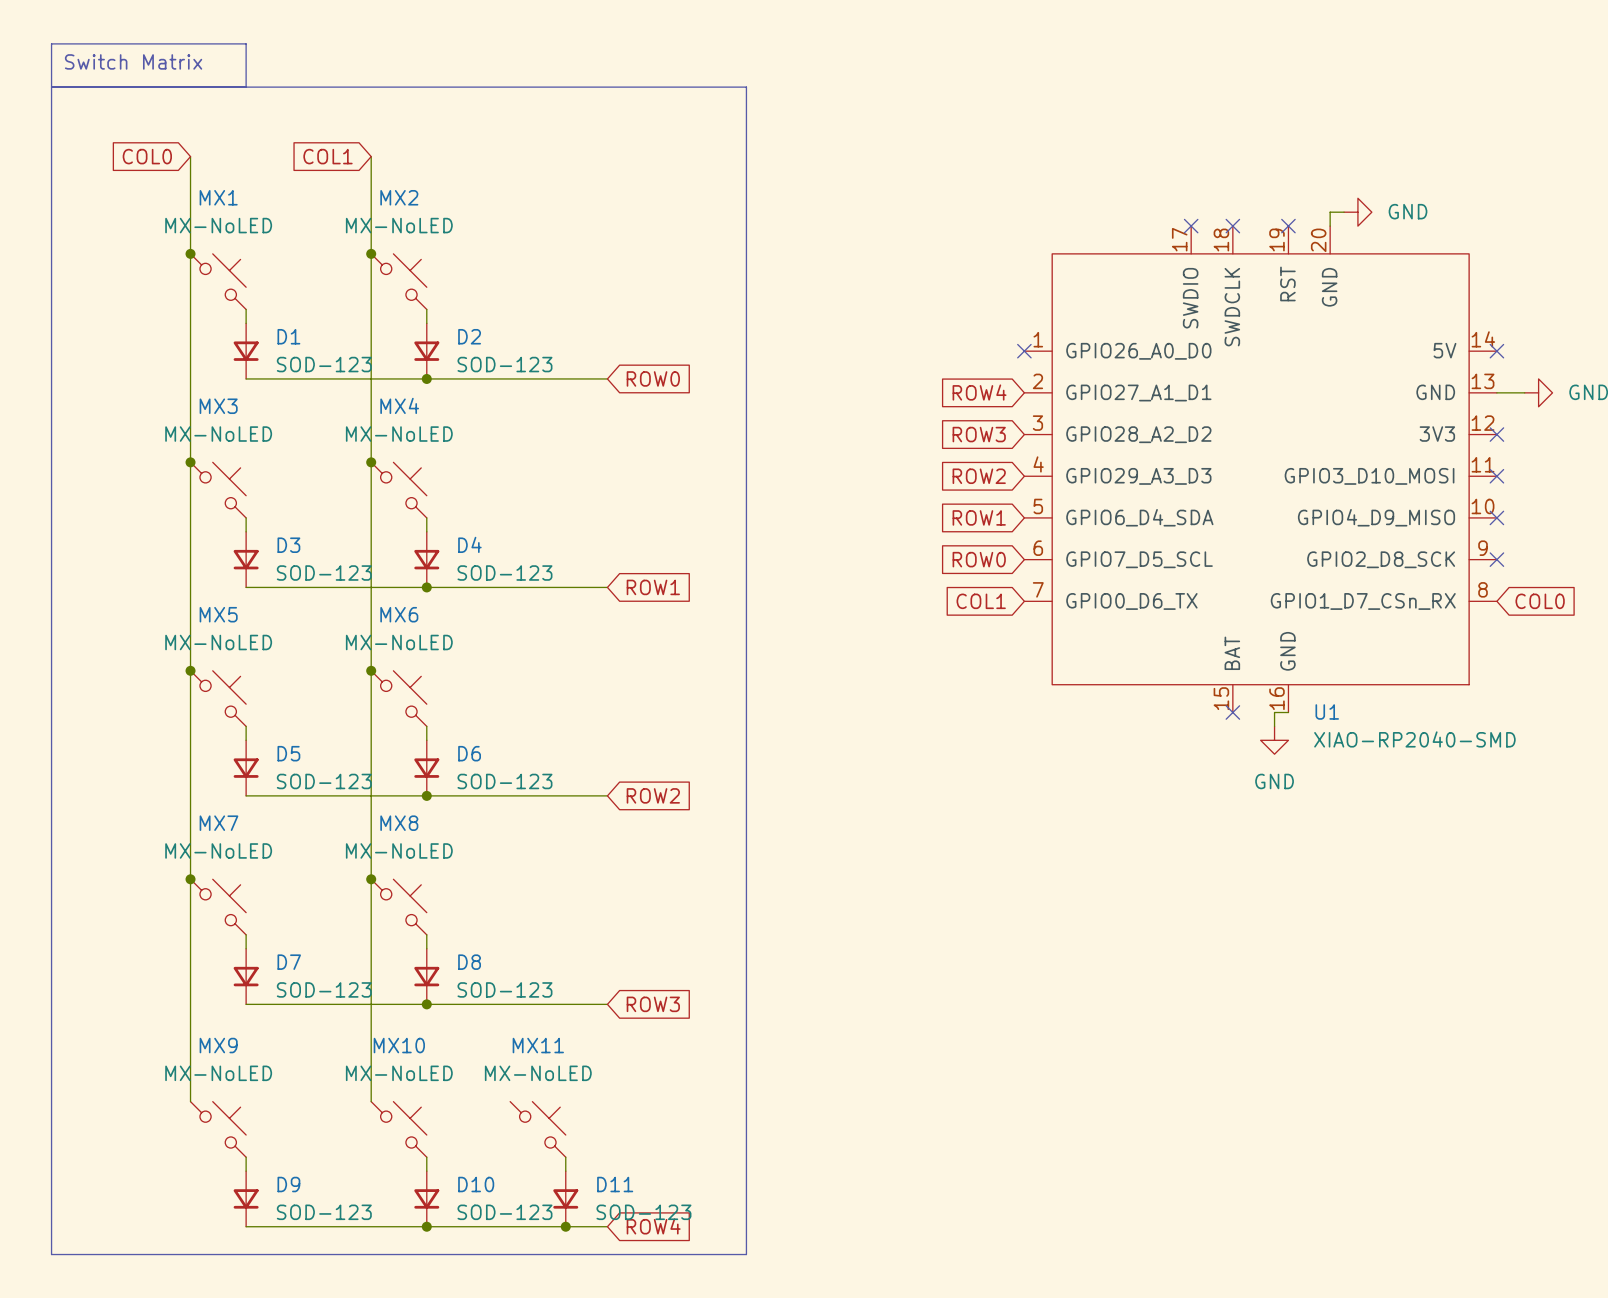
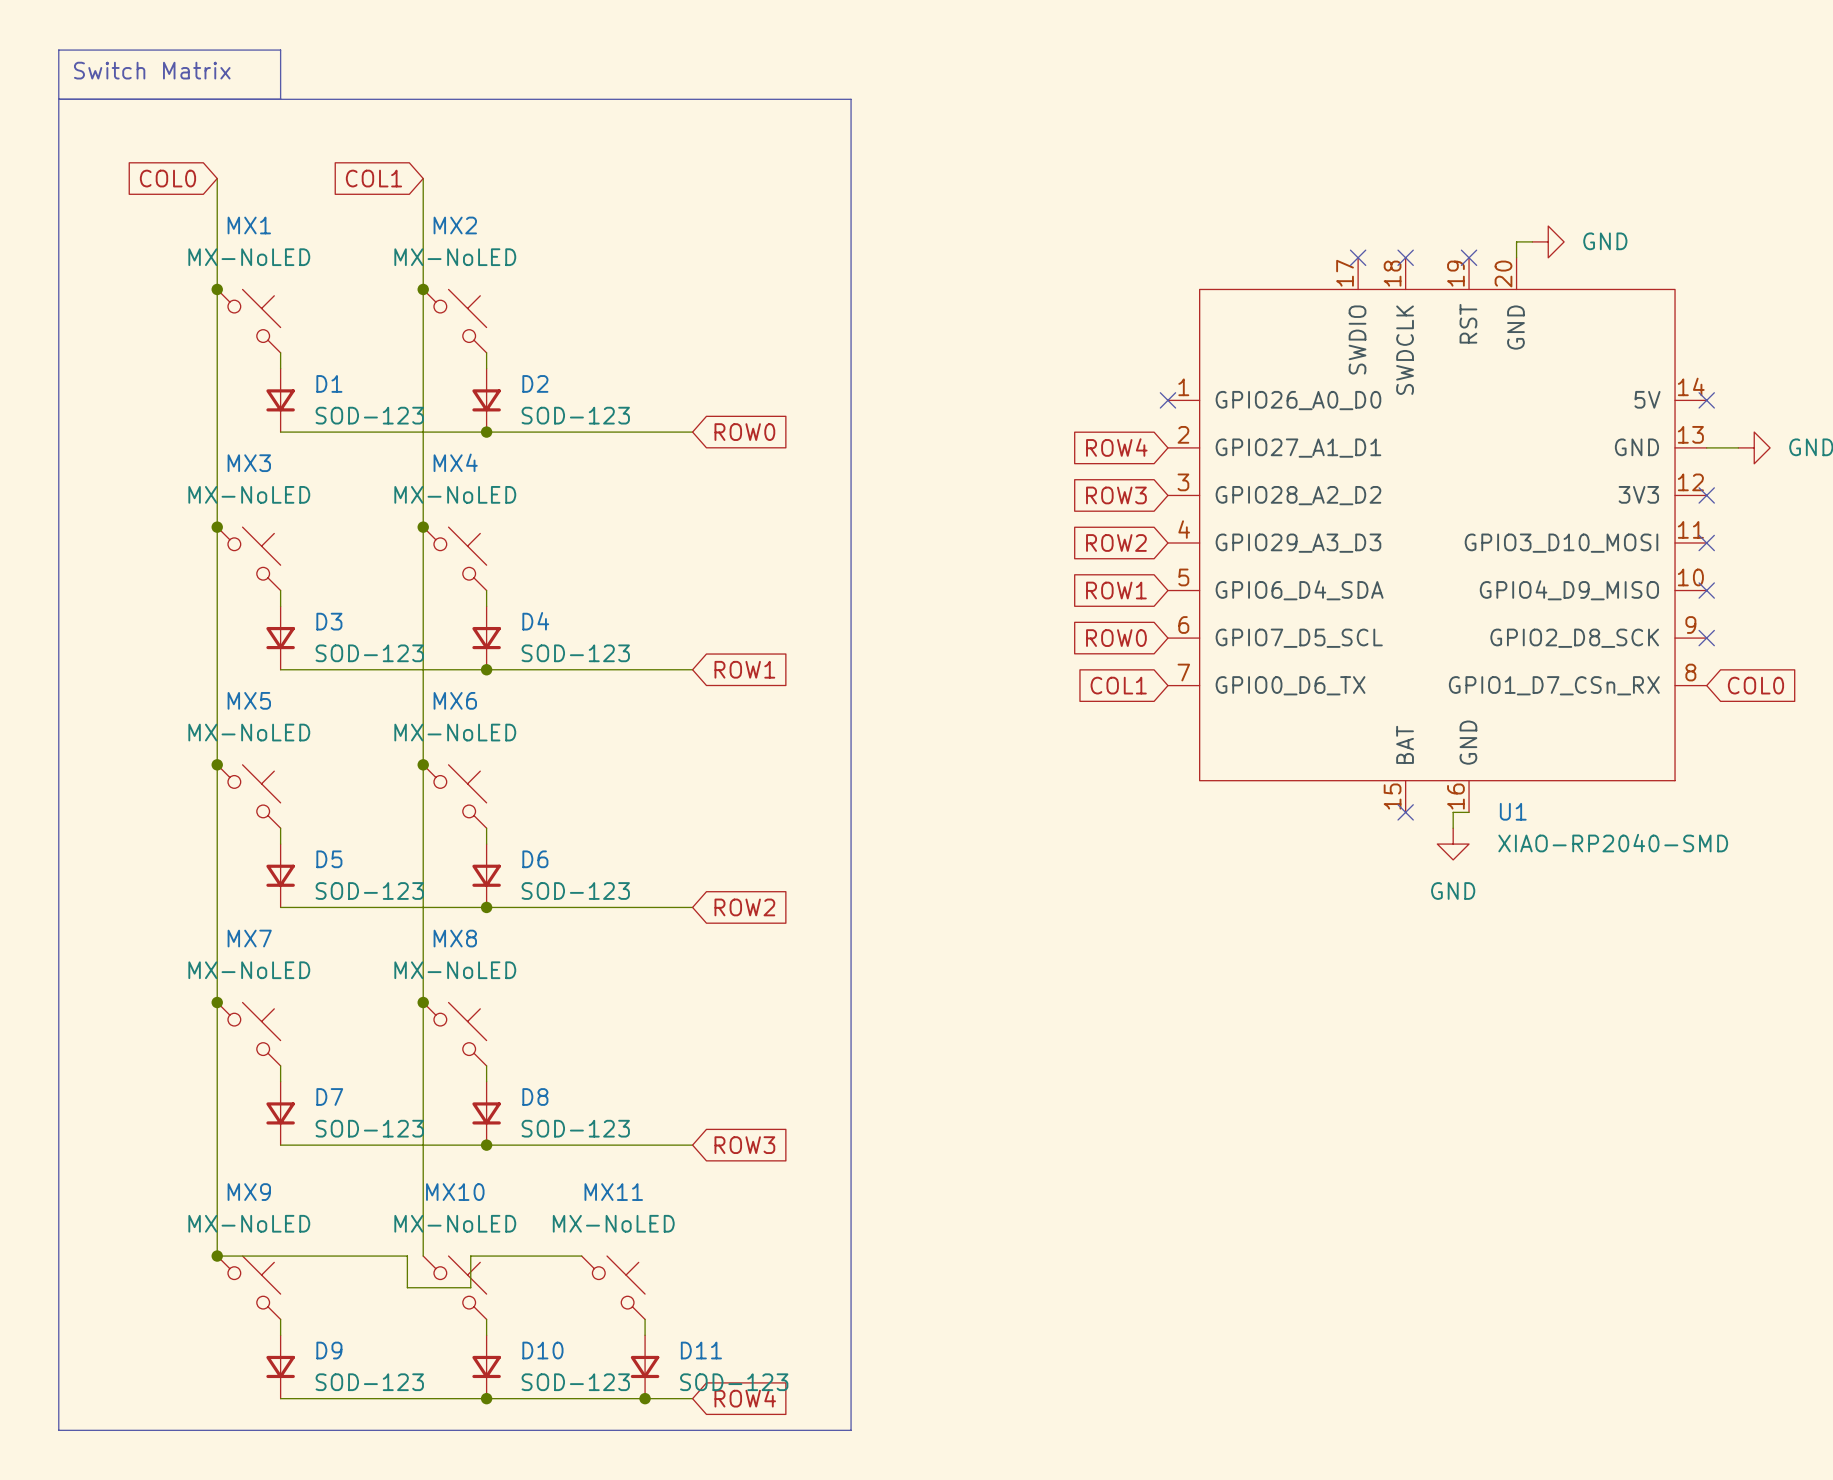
wire: none -> (217, 1256) (407, 1256) (407, 1287) (470, 1287) (470, 1256) (581, 1256)
junction: none -> (217, 1256)

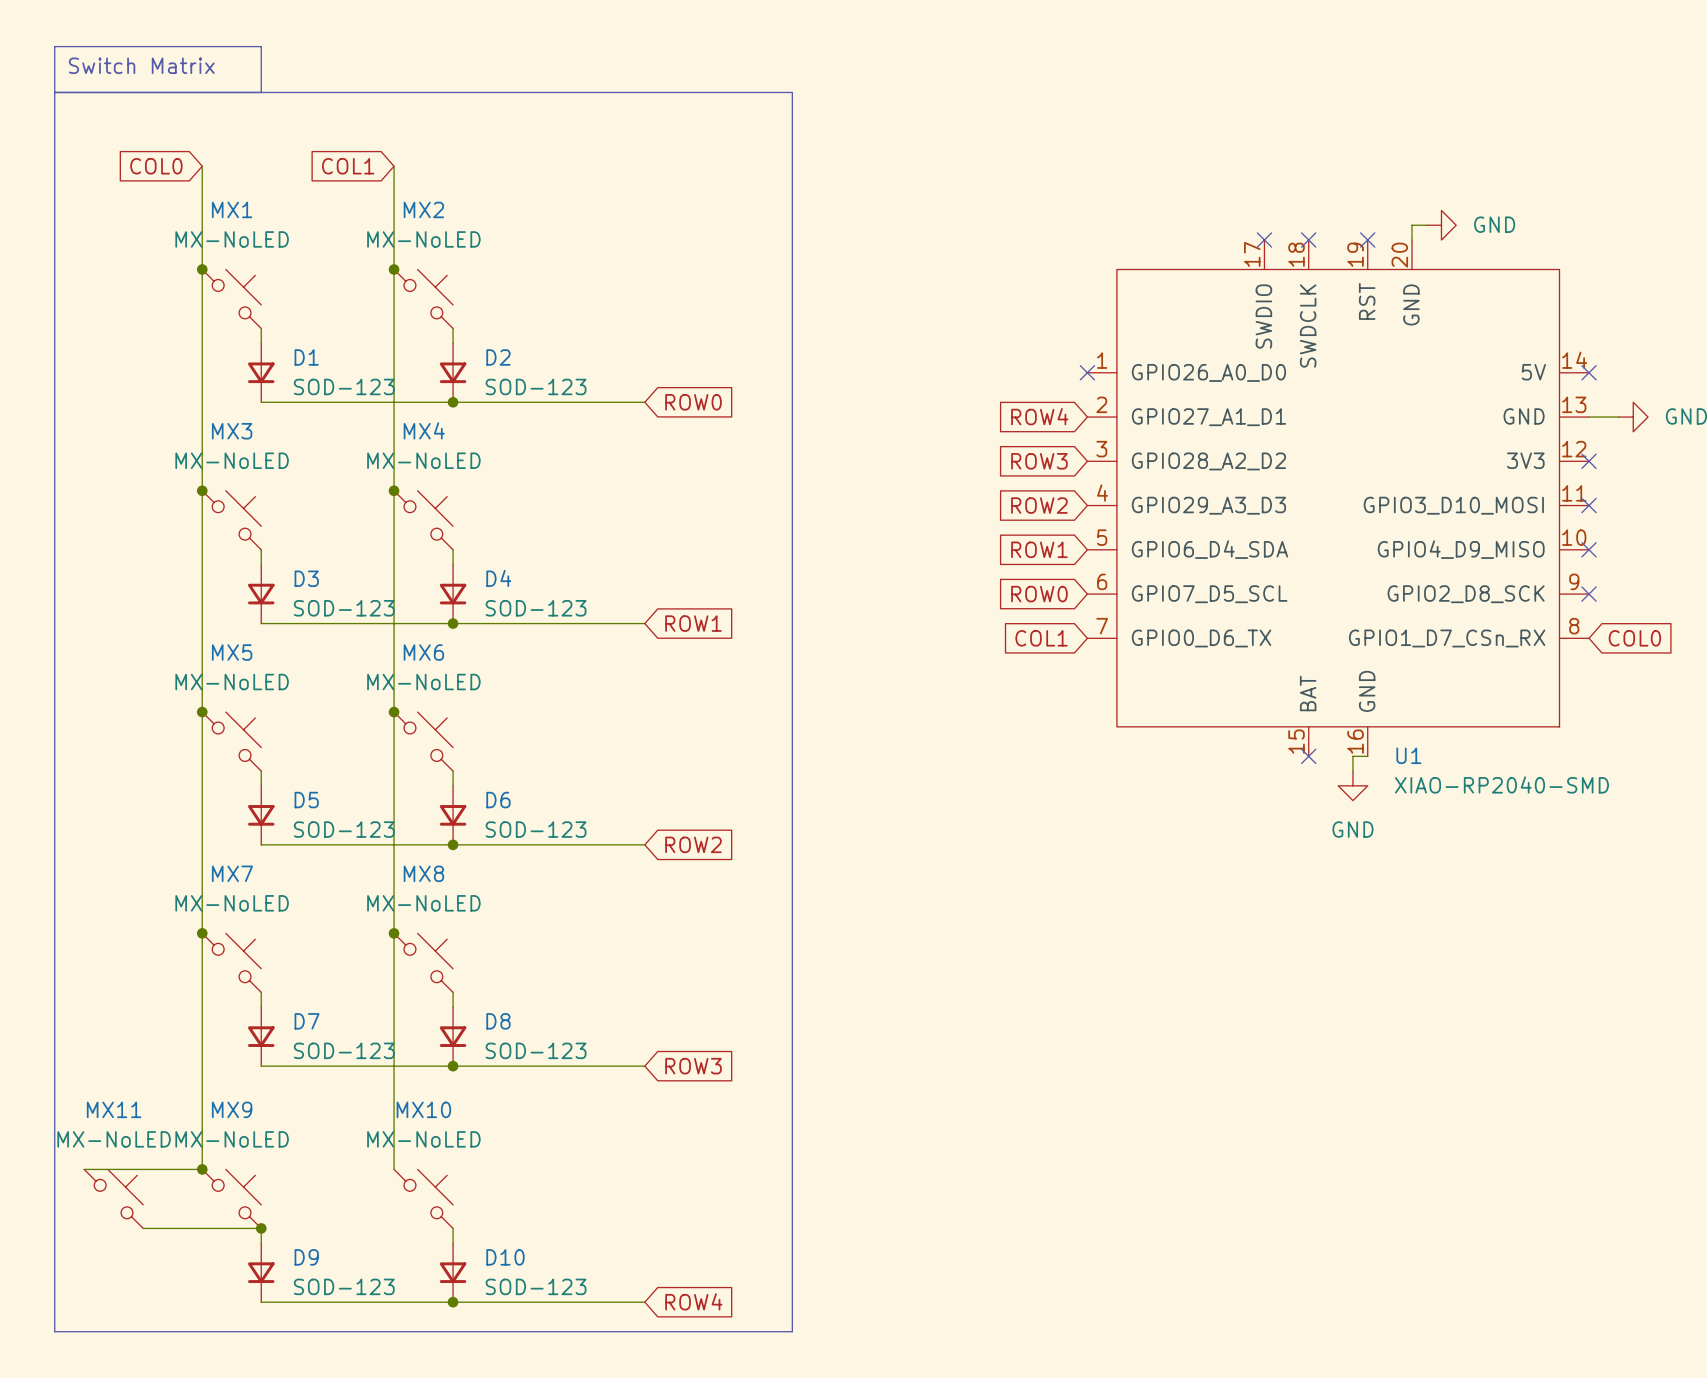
wire: (217, 1256) (407, 1256) (407, 1287) (470, 1287) (470, 1256) (581, 1256) -> (202, 1169) (84, 1169)
MX11 position: (613, 1287) -> (113, 1198)
wire: none -> (143, 1228) (261, 1228)
junction: none -> (261, 1228)
wire: (645, 1319) (645, 1335) -> none
D11: SOD-123 (645, 1366) -> none
junction: (645, 1398) -> none

